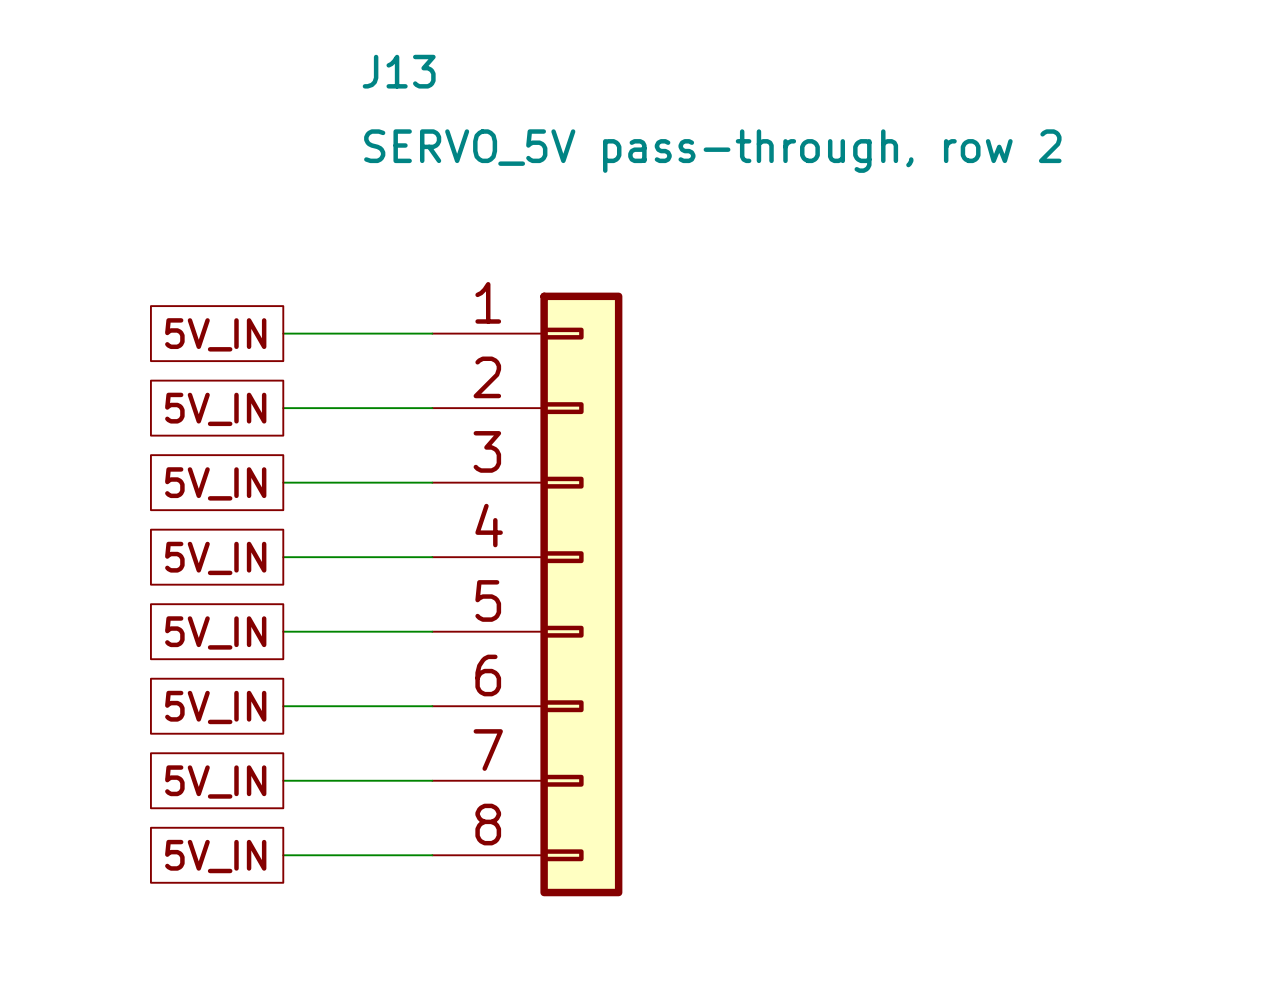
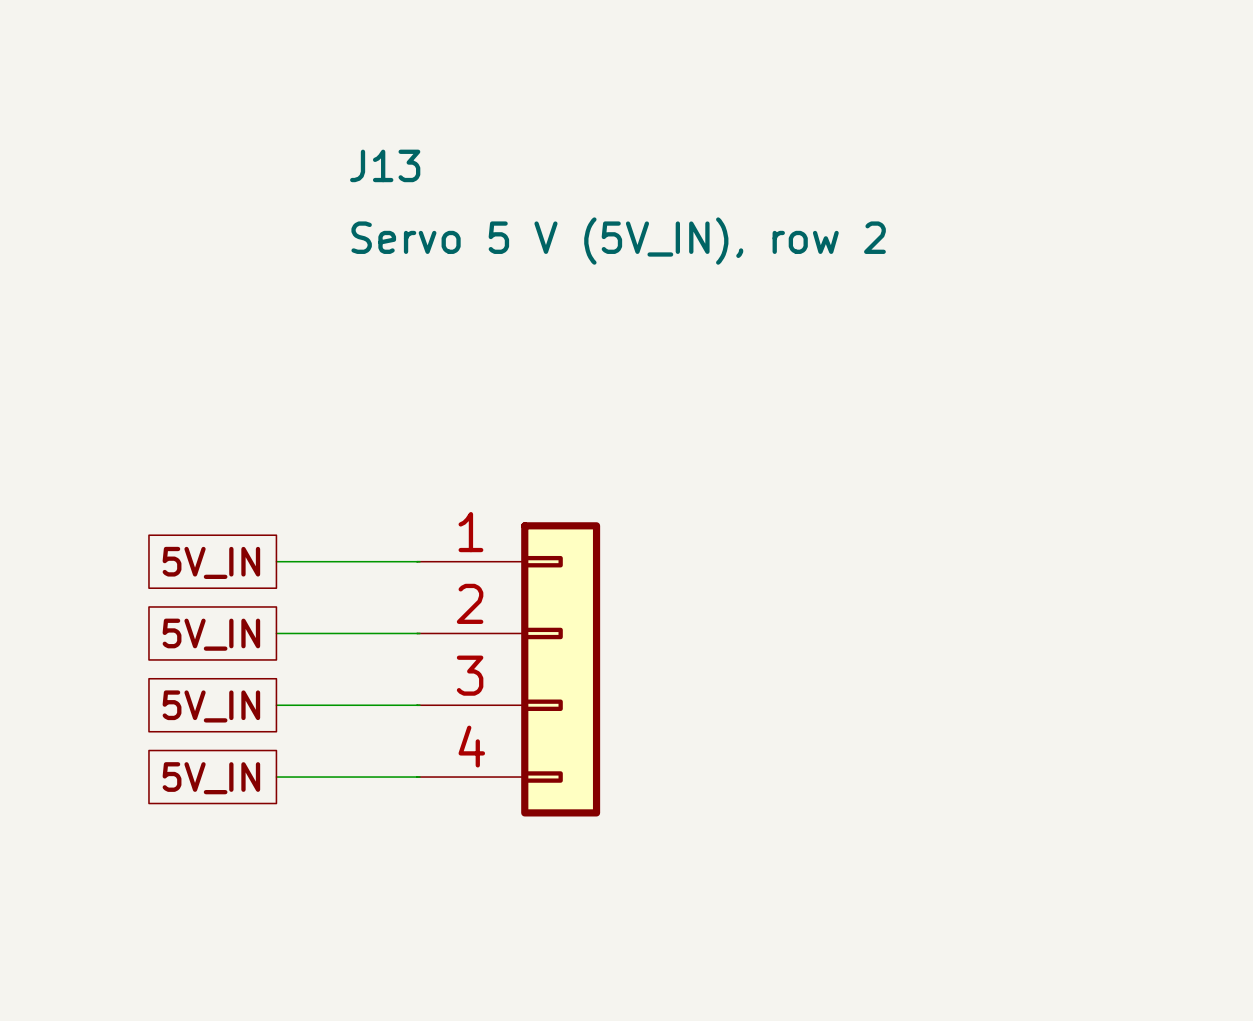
J13 value: SERVO_5V pass-through, row 2 (712, 151) -> Servo 5 V (5V_IN), row 2 (618, 241)
J13 symbol: [432, 292, 623, 897] -> [417, 522, 601, 817]
wire: (283, 333) (432, 333) -> none
global label: 5V_IN (215, 334) -> none
wire: (283, 408) (432, 408) -> none
global label: 5V_IN (215, 409) -> none
wire: (283, 780) (432, 780) -> none
global label: 5V_IN (215, 782) -> none
wire: (283, 855) (432, 855) -> none
global label: 5V_IN (215, 856) -> none

